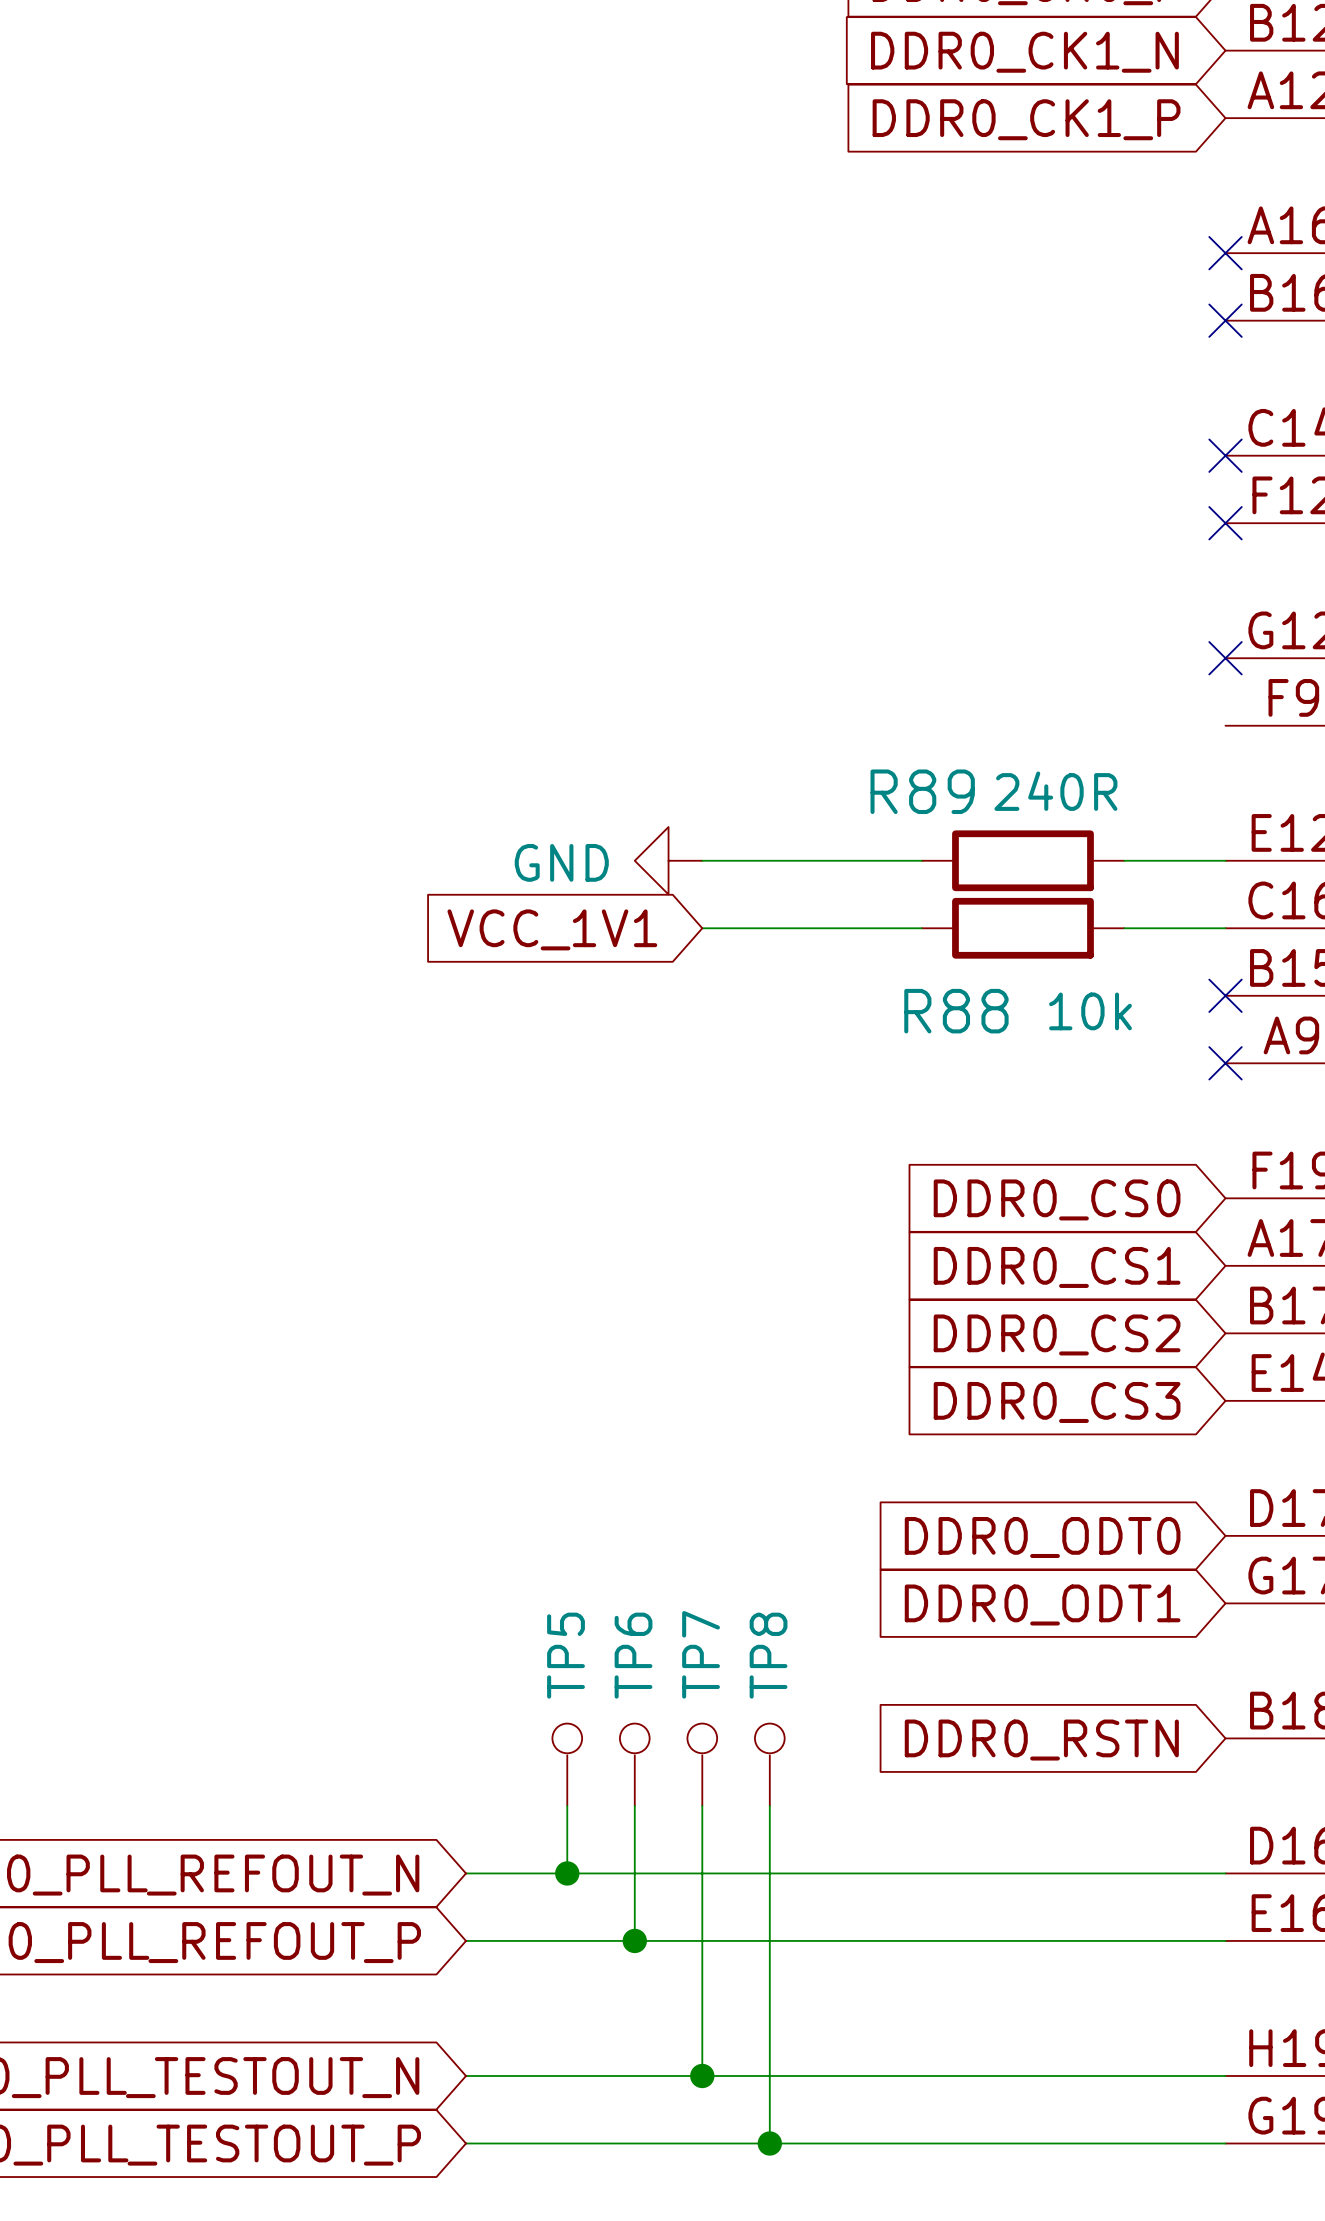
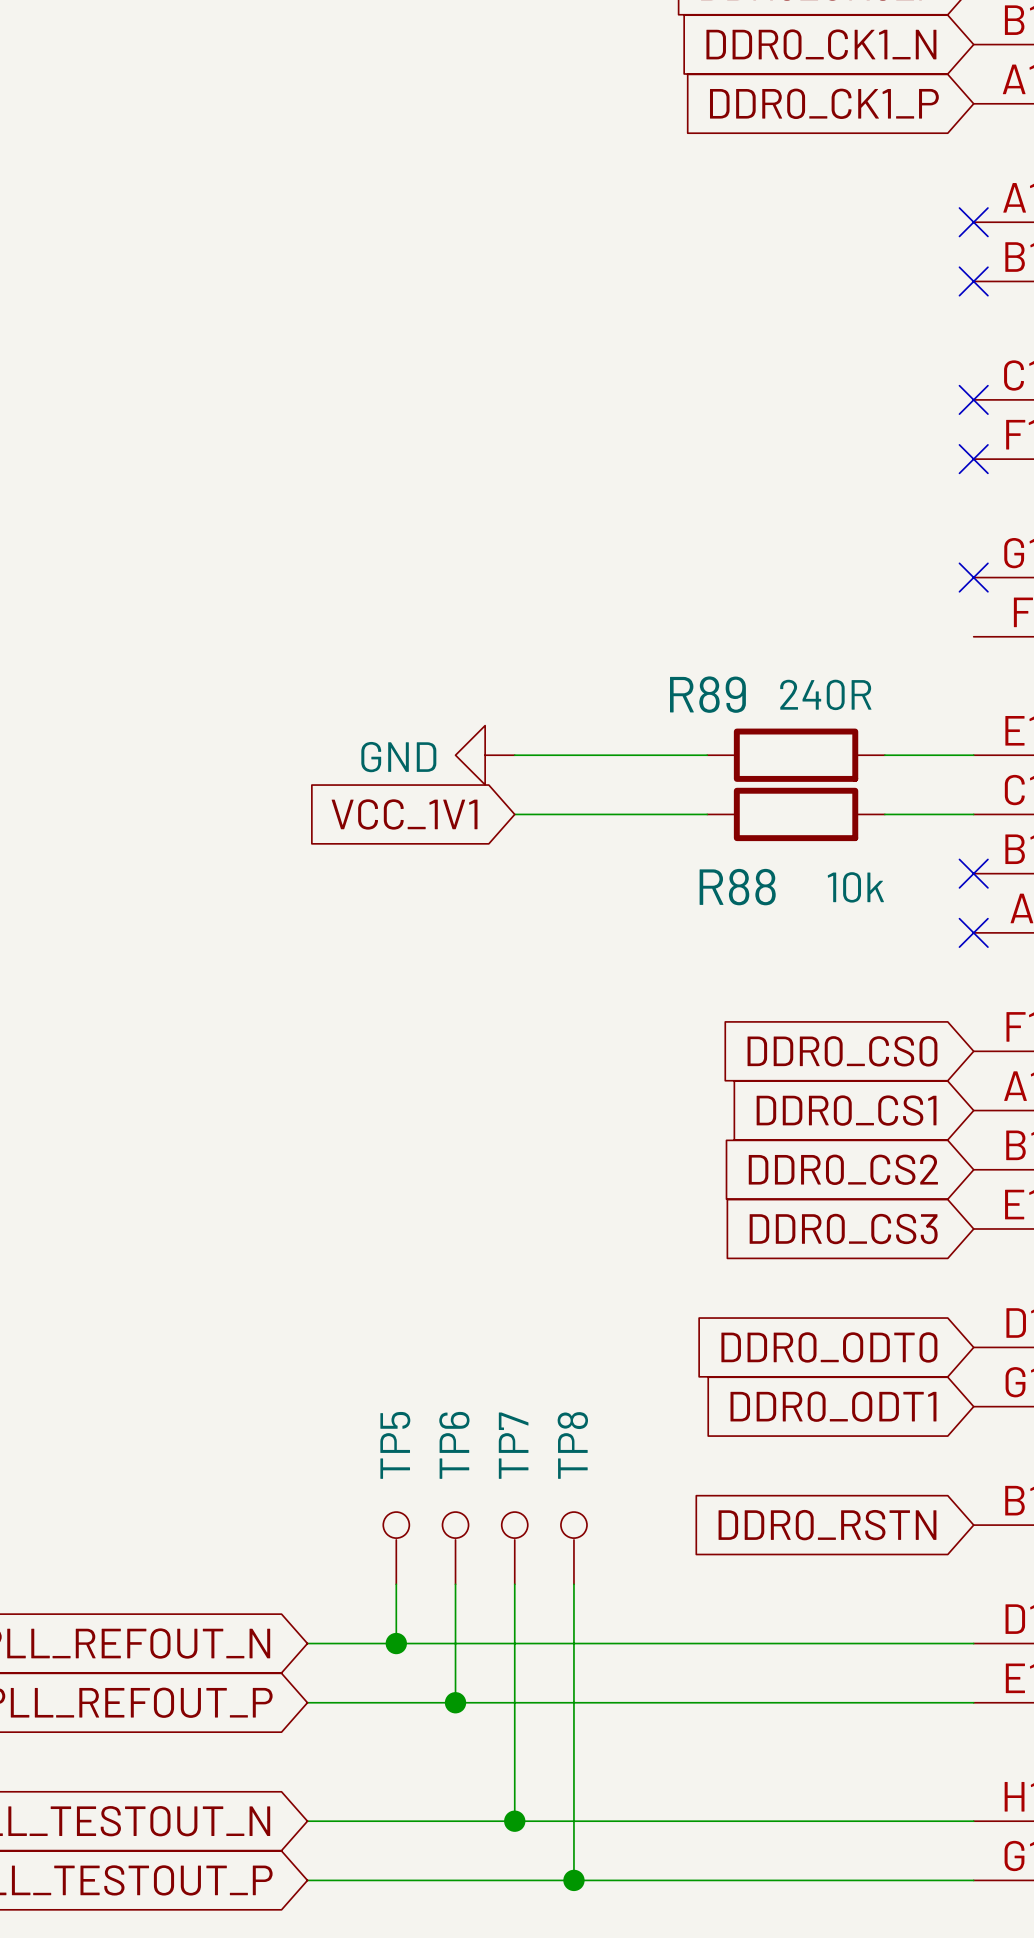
TP7 name position: TP7 (701, 1654) -> TP7 (513, 1445)
TP5 name position: TP5 (566, 1655) -> TP5 (395, 1445)
TP6 name position: TP6 (633, 1655) -> TP6 (454, 1445)
TP8 name position: TP8 (768, 1655) -> TP8 (572, 1445)

